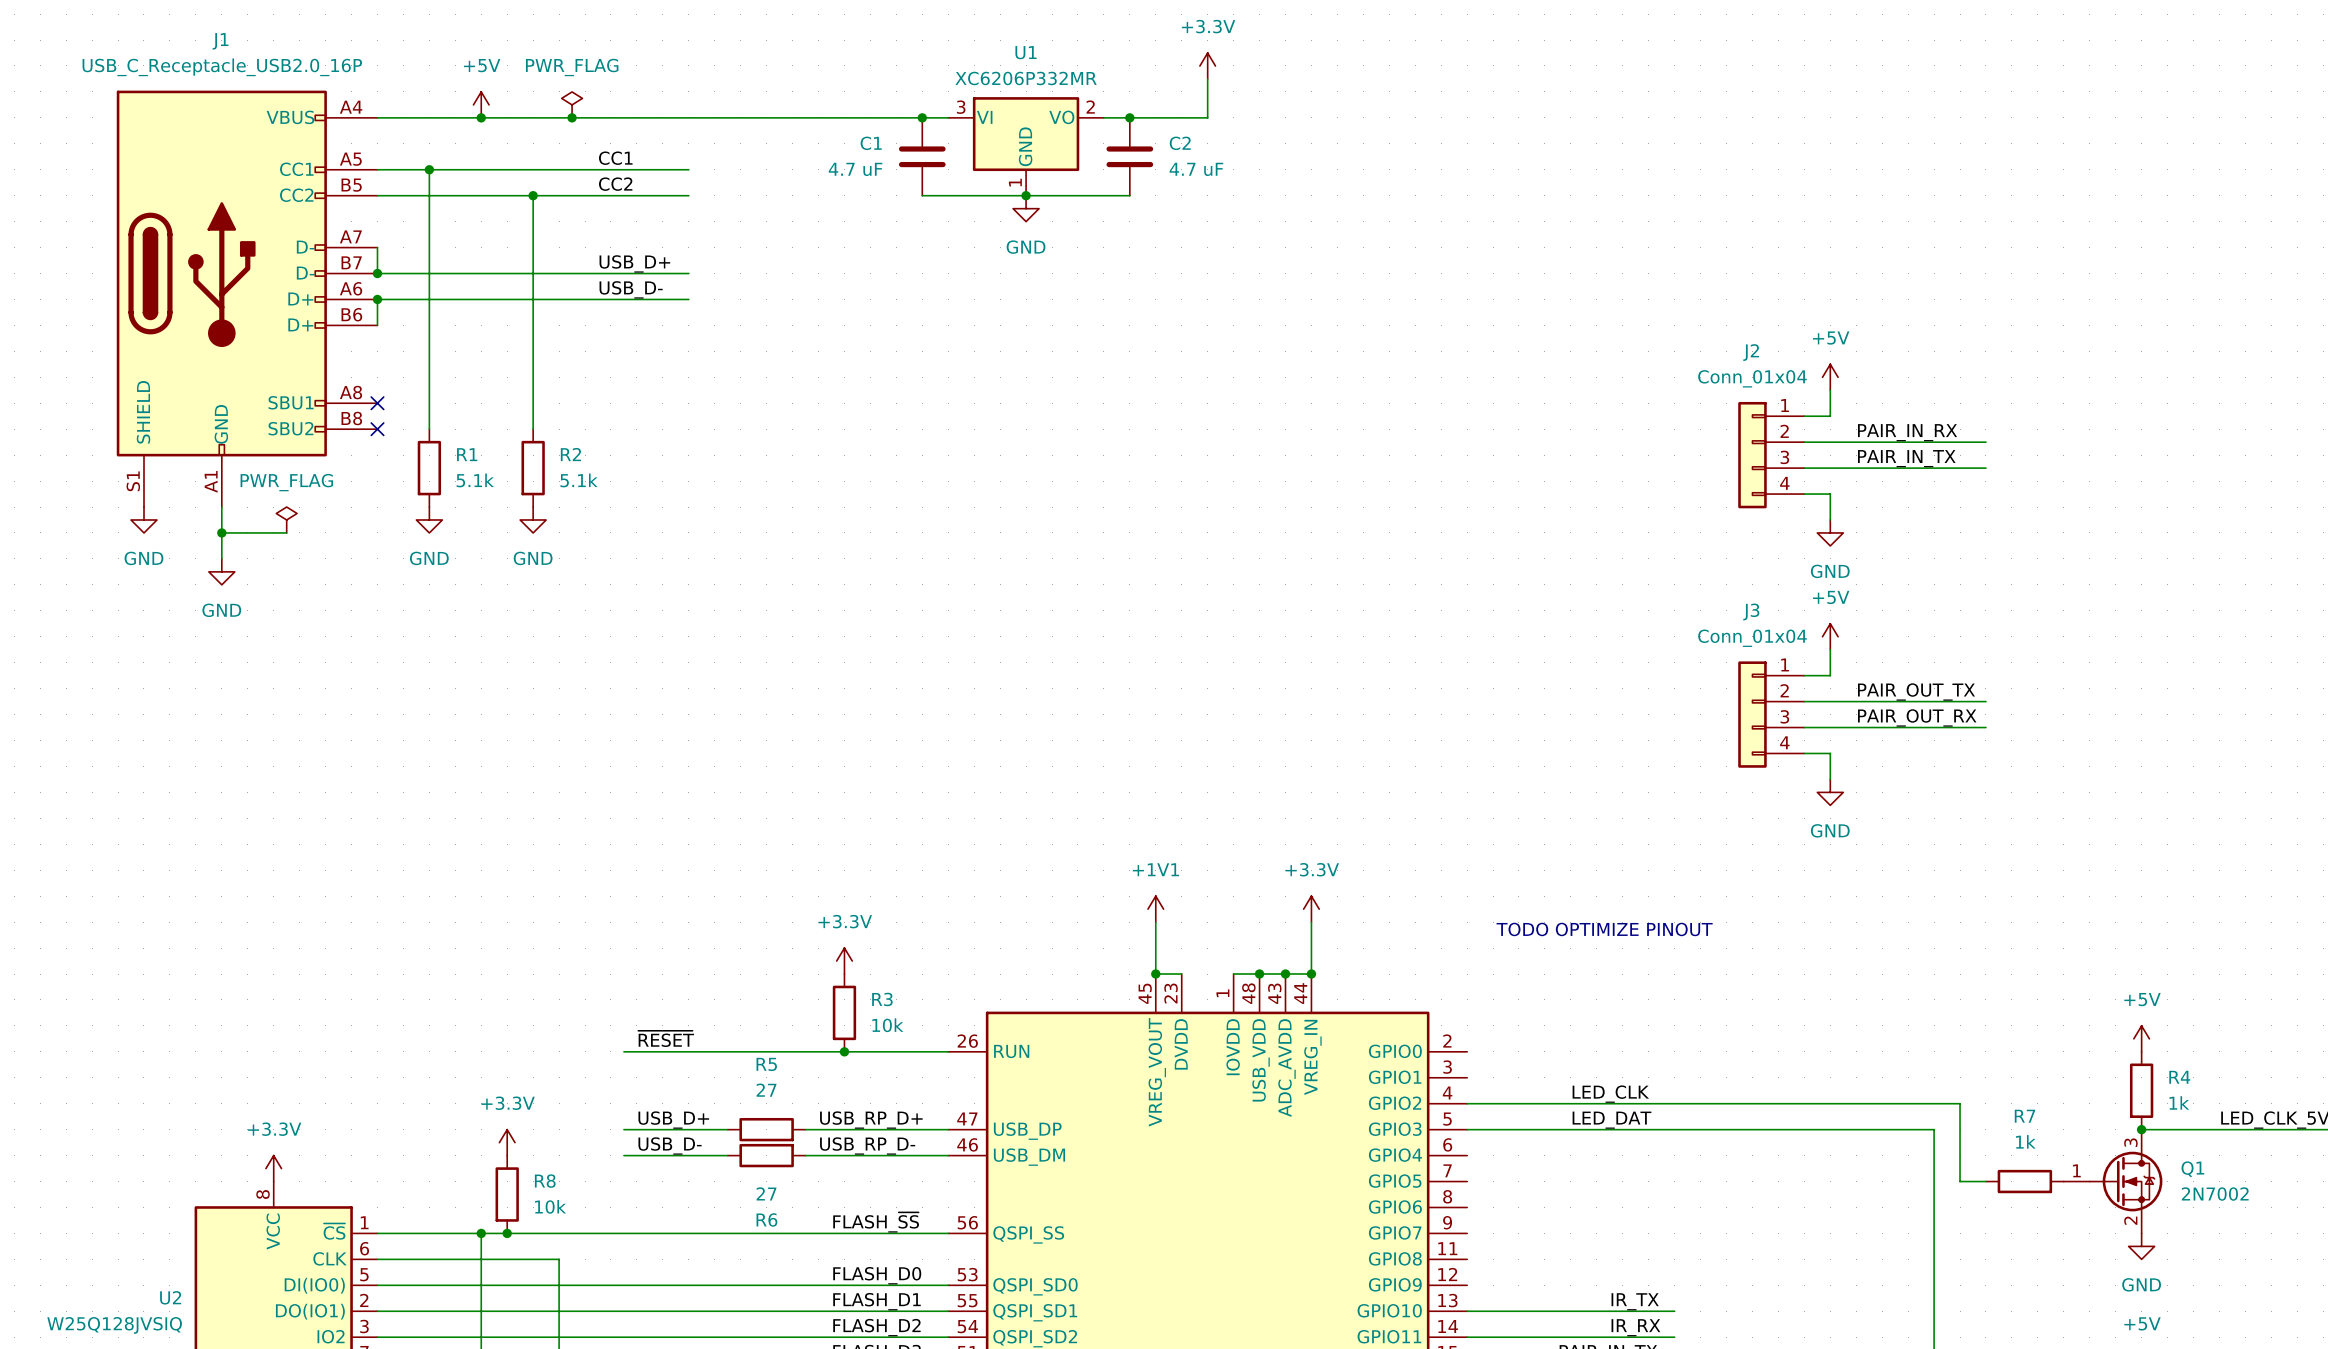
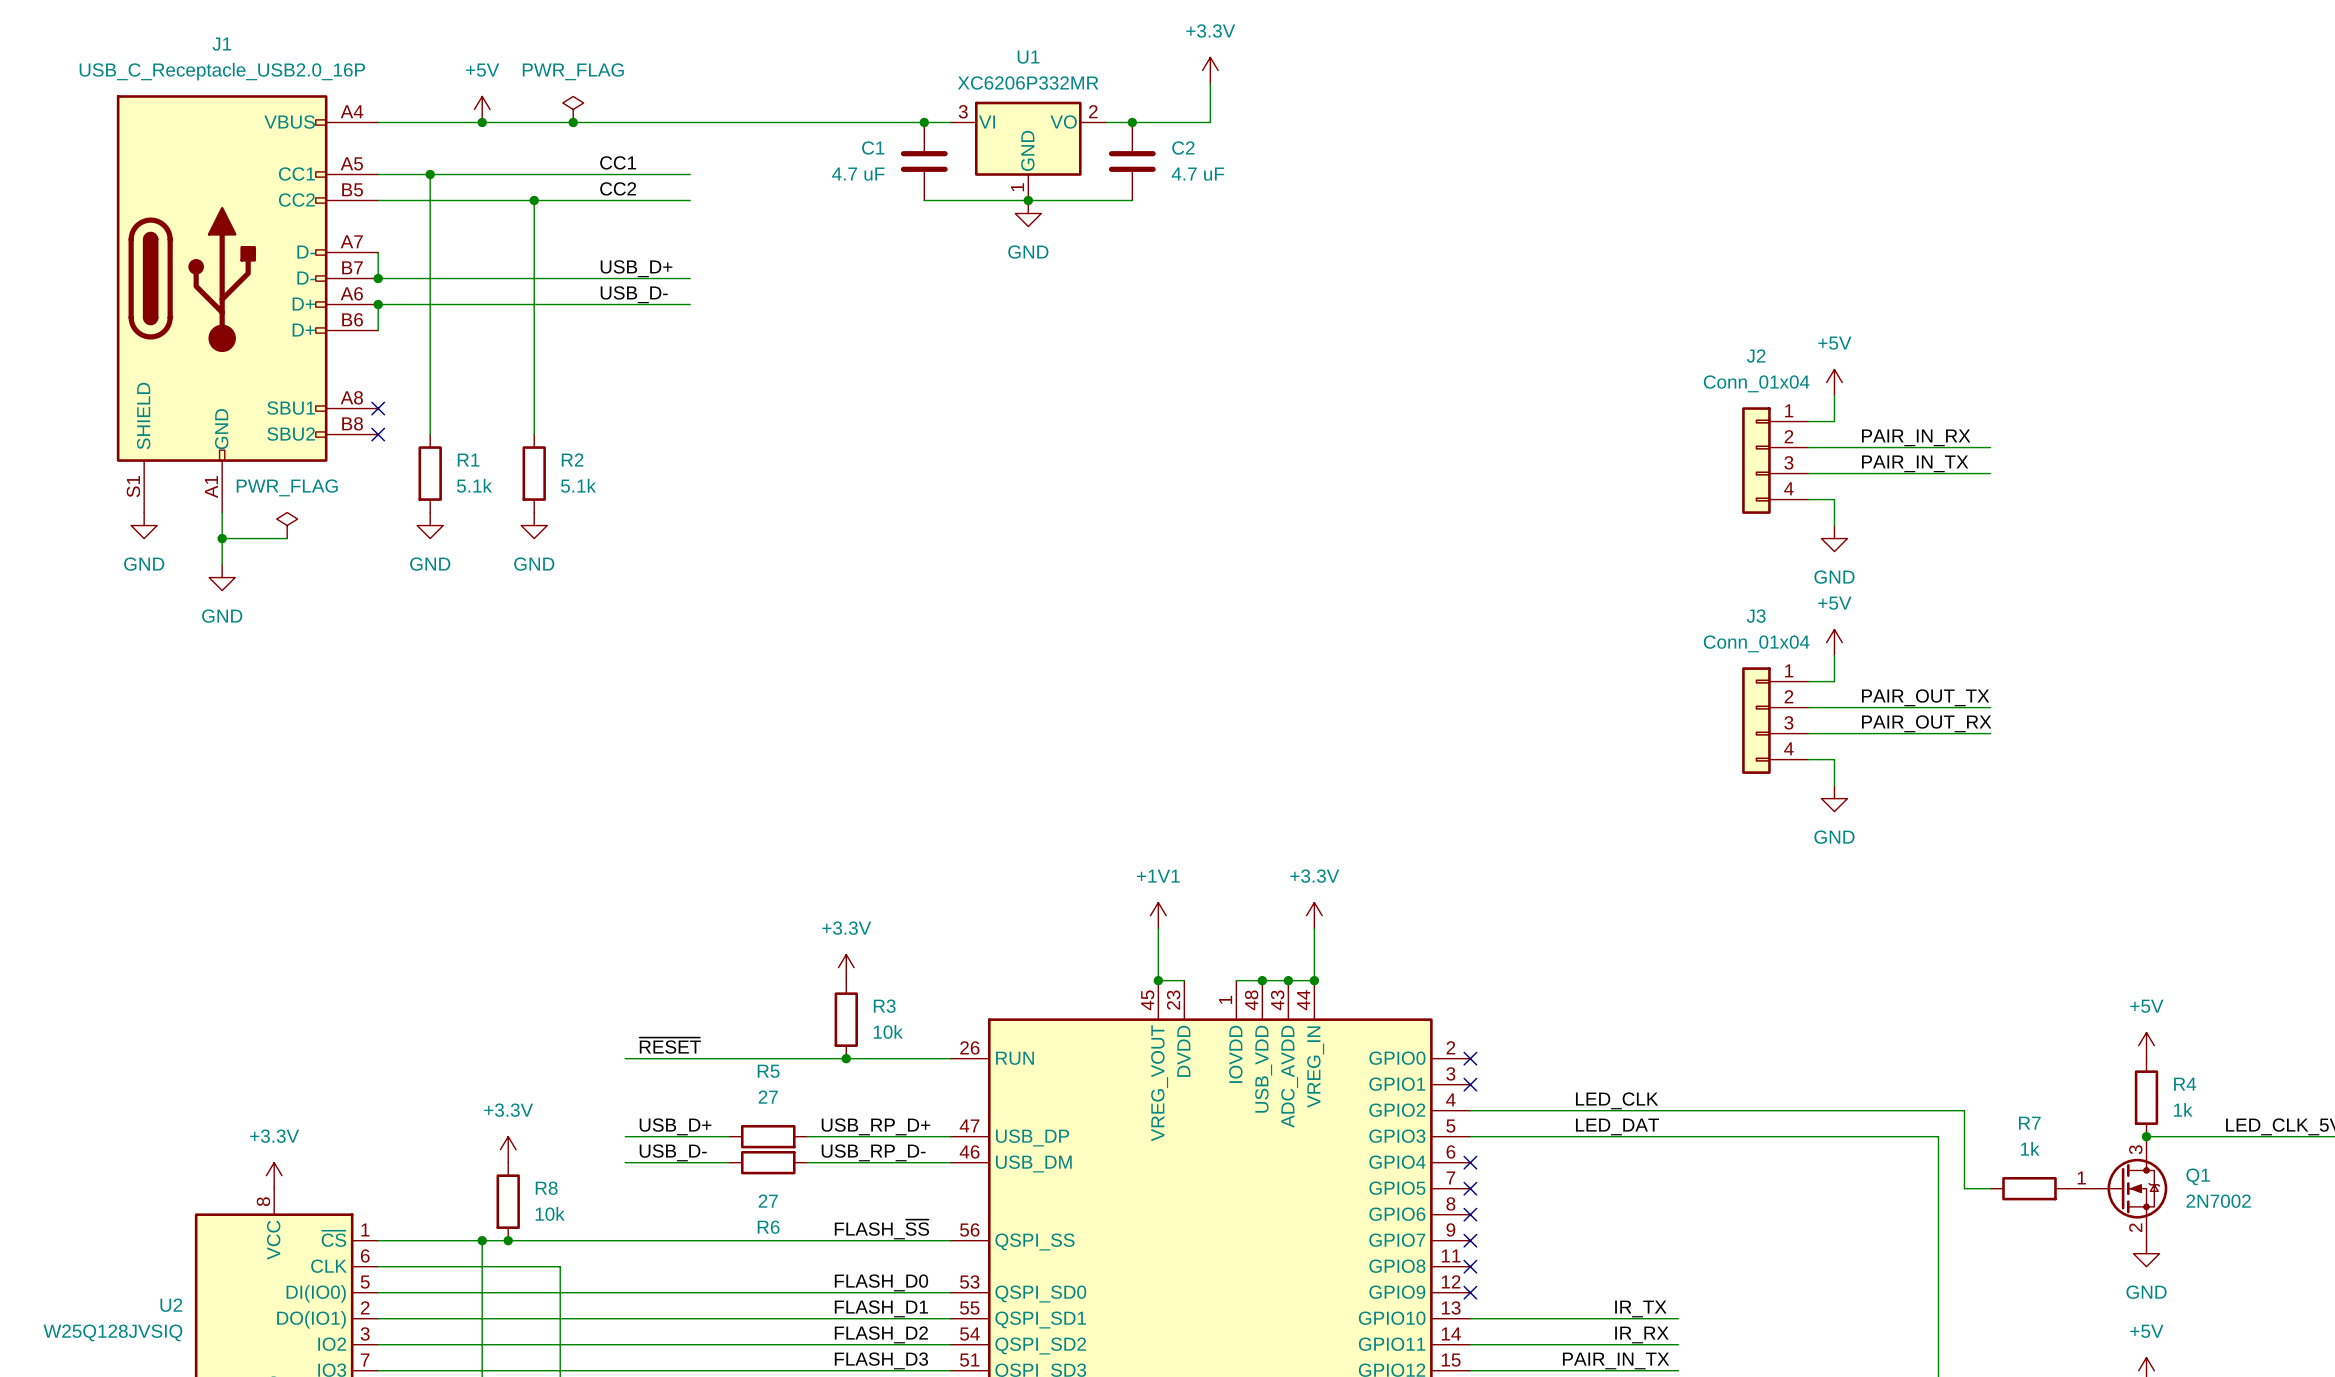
text: TODO OPTIMIZE PINOUT (1604, 929) -> none
no-connect mark: none -> (1470, 1058)
no-connect mark: none -> (1470, 1084)
no-connect mark: none -> (1470, 1162)
no-connect mark: none -> (1470, 1188)
no-connect mark: none -> (1470, 1214)
no-connect mark: none -> (1470, 1240)
no-connect mark: none -> (1470, 1266)
no-connect mark: none -> (1470, 1292)

